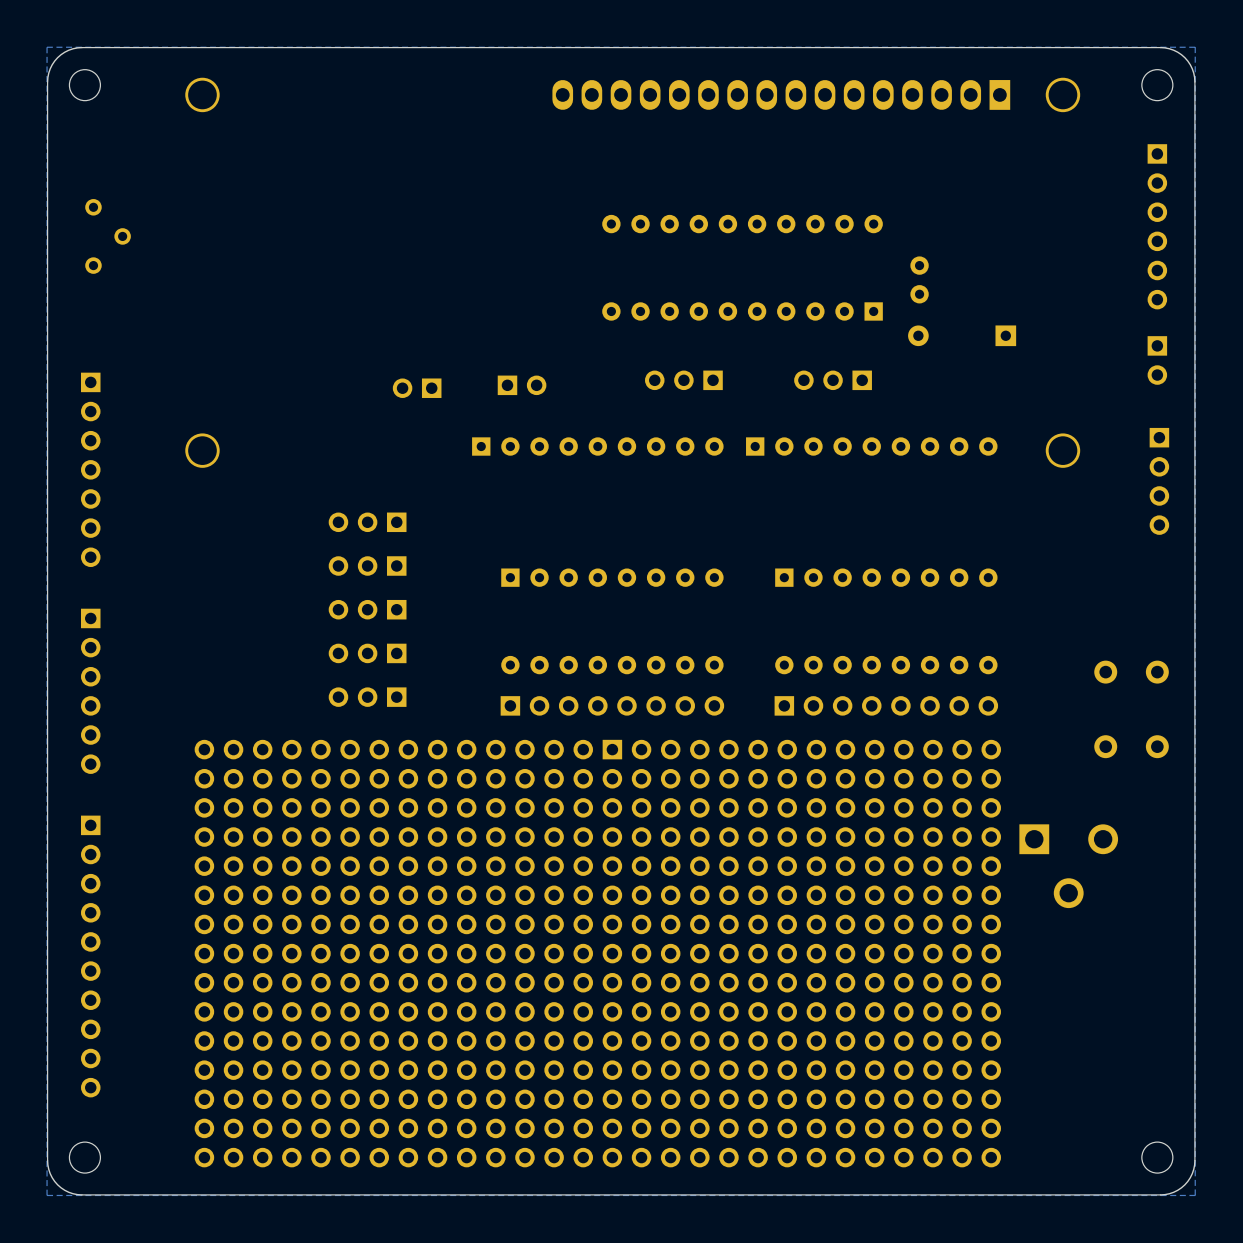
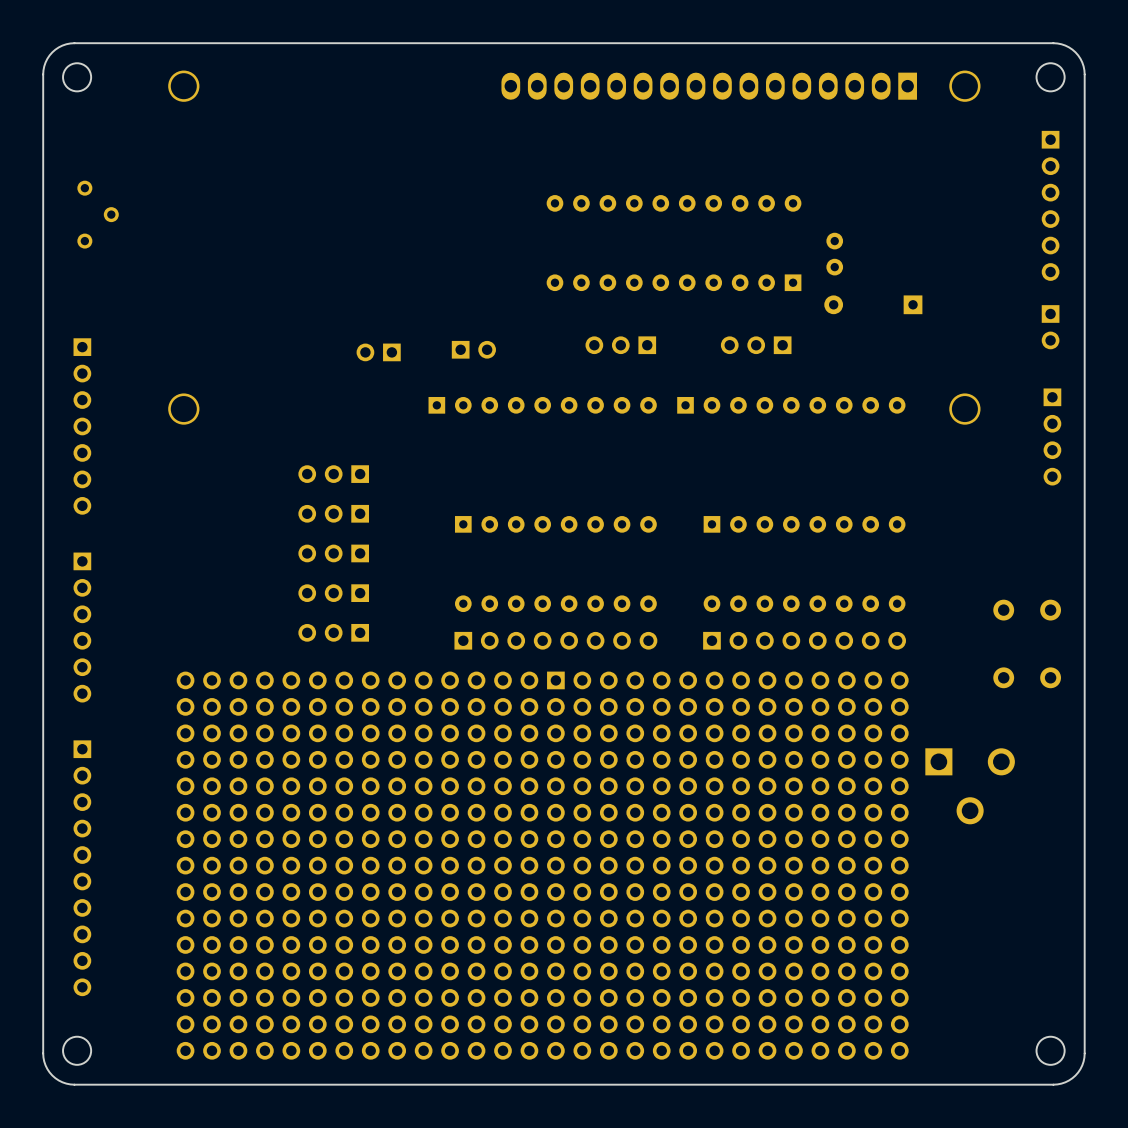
zone outline: (1195, 47) (1195, 1195) (47, 1195) (47, 47) (1195, 47) -> none

